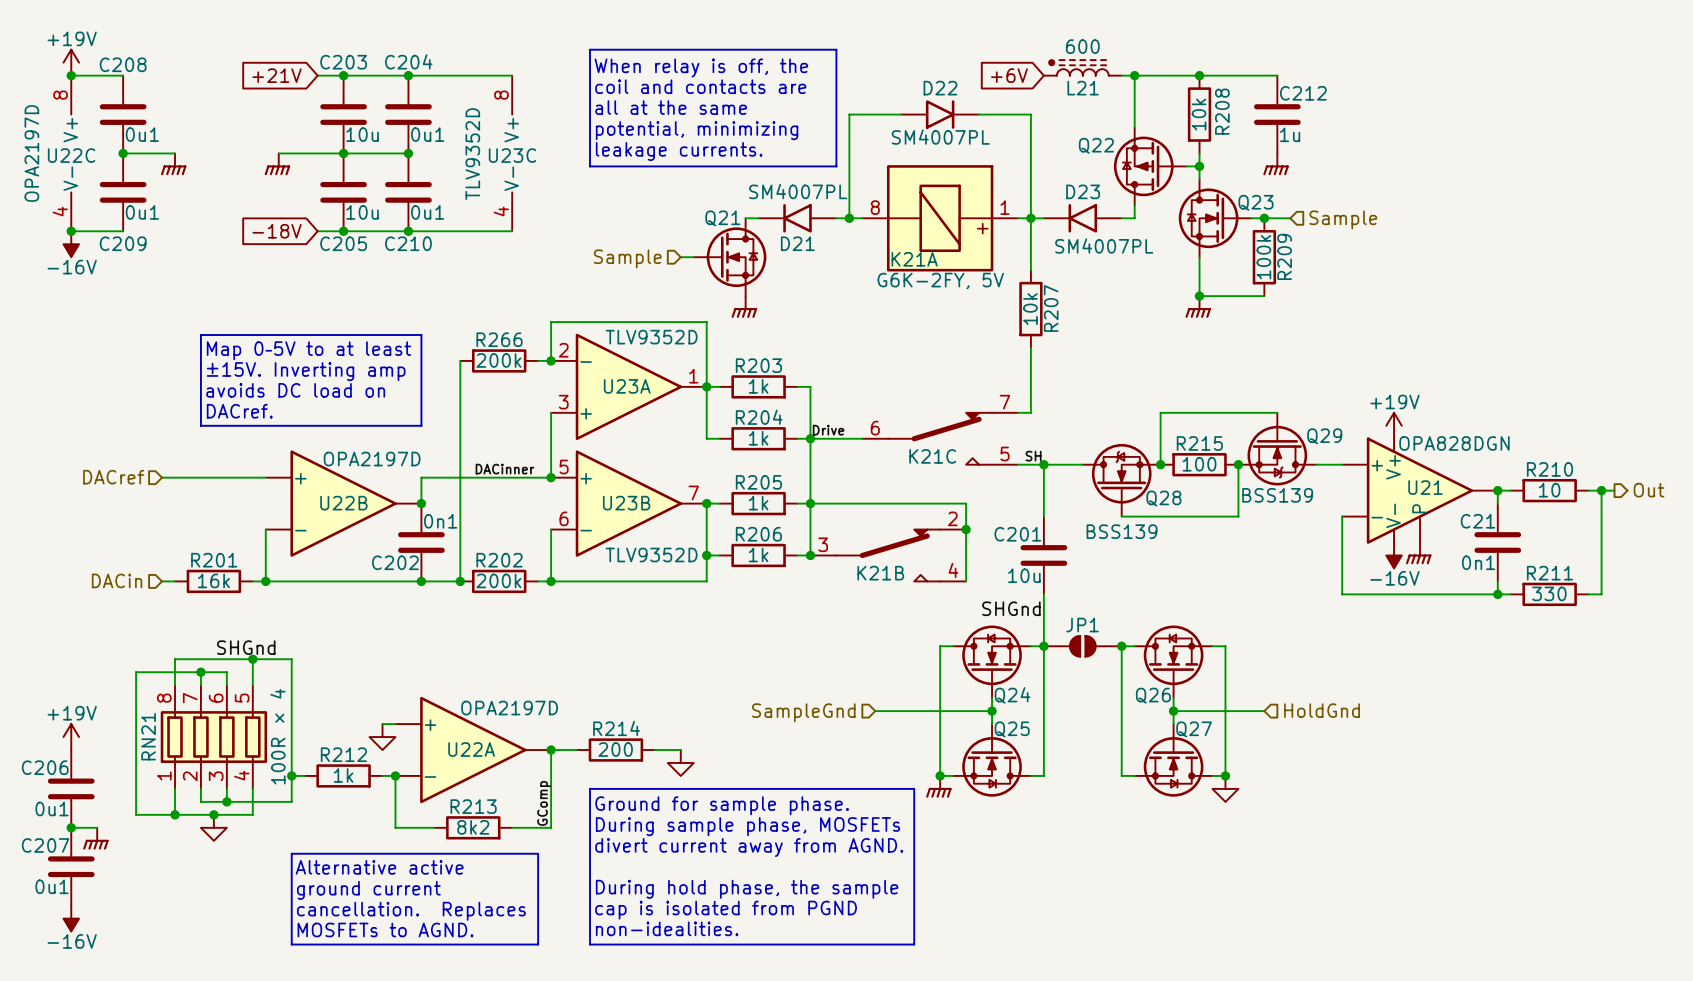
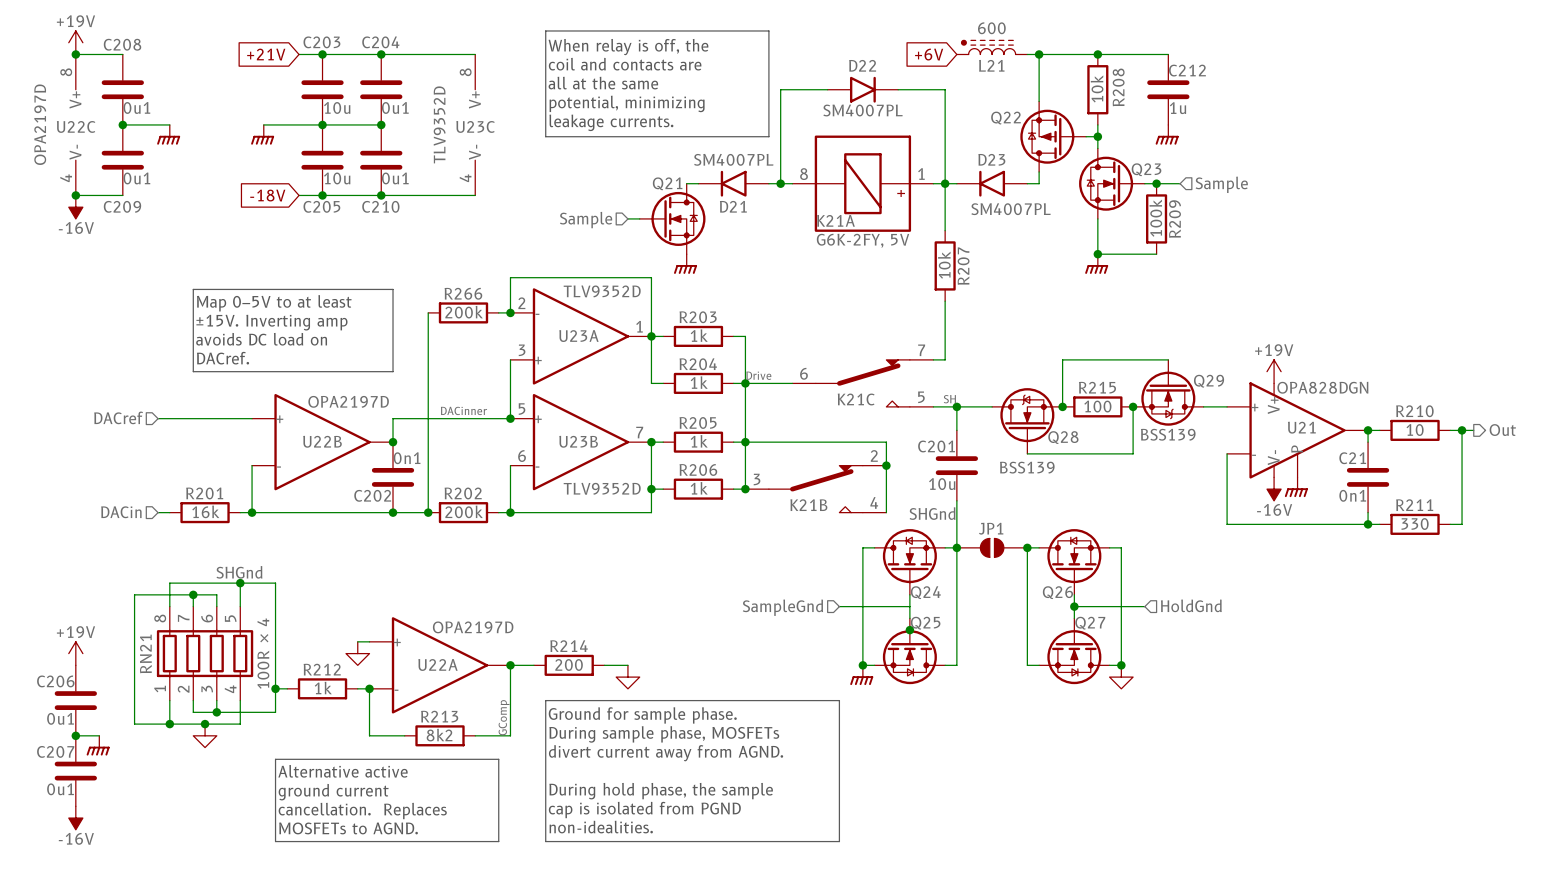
C201 position: (1043, 555) -> (956, 465)
label position: SHGnd (1011, 608) -> SHGnd (932, 513)
wire: (940, 646) (953, 646) -> (862, 571) (862, 547) (874, 547)
wire: (1030, 646) (1043, 646) -> (945, 547) (956, 547)
junction position: (1043, 646) -> (956, 547)
JP1 position: (1082, 646) -> (992, 547)
wire: (1121, 646) (1134, 646) -> (1027, 571) (1027, 547) (1039, 547)
junction position: (1121, 646) -> (1027, 547)
wire: (1212, 646) (1225, 646) -> (1109, 547) (1121, 547) (1121, 571)
Q24 position: (992, 661) -> (909, 561)
Q26 position: (1173, 661) -> (1074, 561)
wire: none -> (839, 606) (909, 606)
wire: none -> (1074, 606) (1144, 606)
hierarchical label position: HoldGnd (1322, 710) -> HoldGnd (1191, 605)
wire: (875, 711) (992, 711) -> none
wire: (1173, 711) (1264, 711) -> none
junction position: (1173, 711) -> (1074, 606)
hierarchical label position: SampleGnd (803, 712) -> SampleGnd (782, 607)
wire: (940, 750) (940, 775) (953, 775) -> (862, 665) (874, 665)
wire: (1043, 750) (1043, 775) (1030, 775) -> (956, 665) (945, 665)
wire: (1121, 750) (1121, 775) (1134, 775) -> (1027, 665) (1039, 665)
wire: (1225, 750) (1225, 775) (1212, 775) -> (1121, 665) (1109, 665)
Q25 position: (992, 760) -> (909, 651)
Q27 position: (1173, 760) -> (1074, 651)
junction position: (940, 775) -> (862, 665)
junction position: (1225, 775) -> (1121, 665)
power symbol position: (938, 786) -> (861, 675)
power symbol position: (1225, 788) -> (1121, 677)

